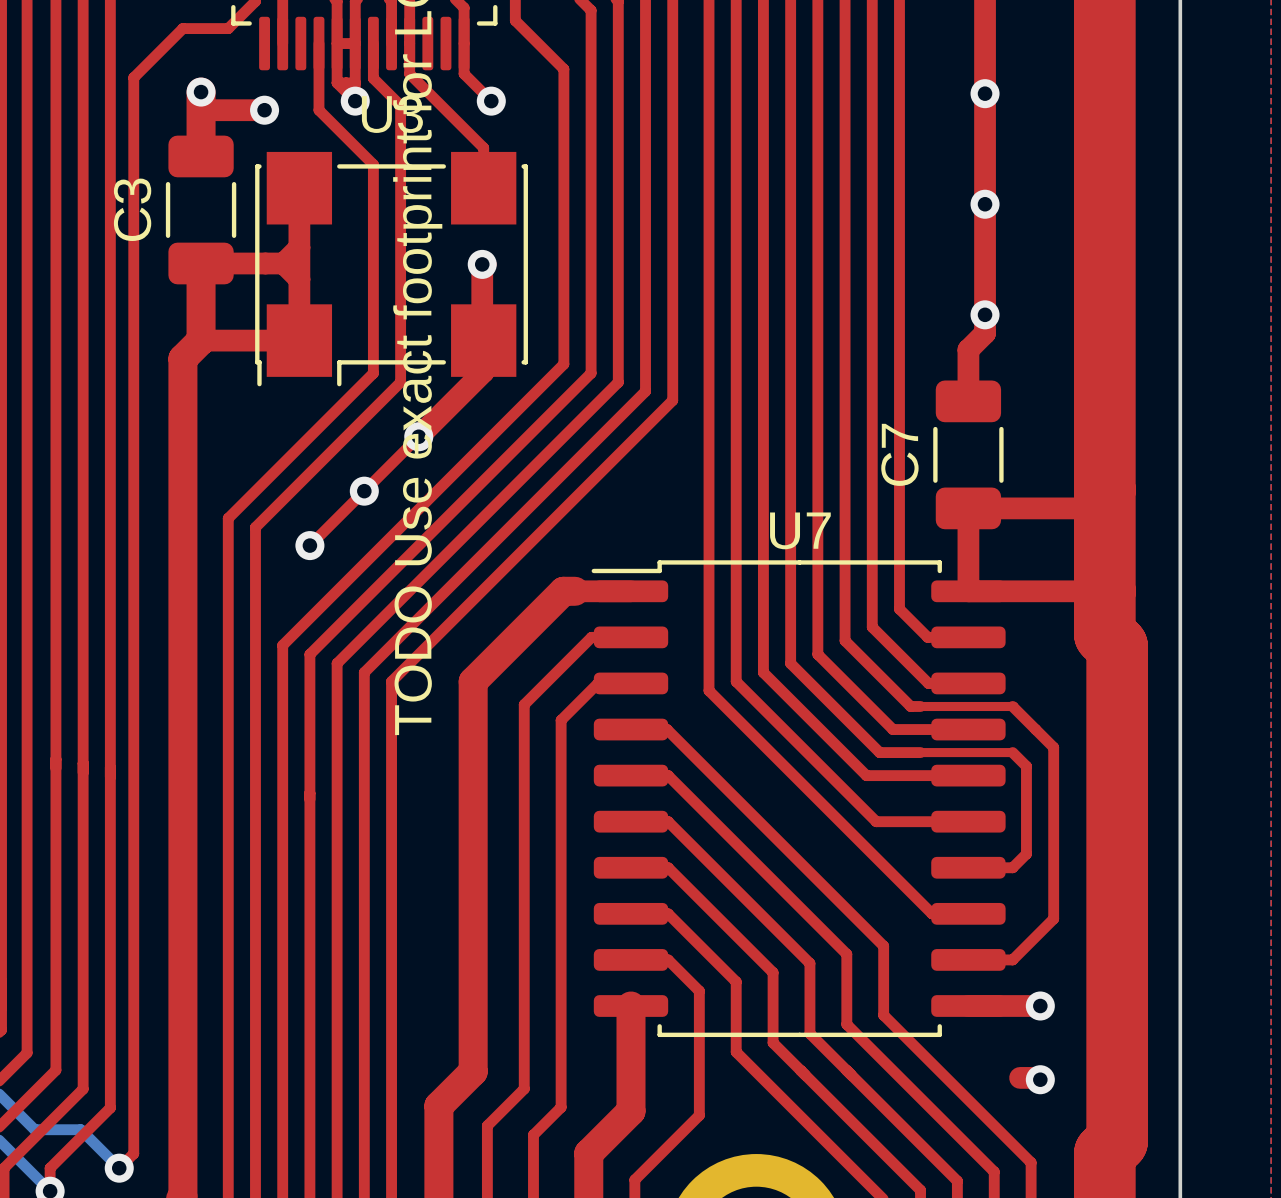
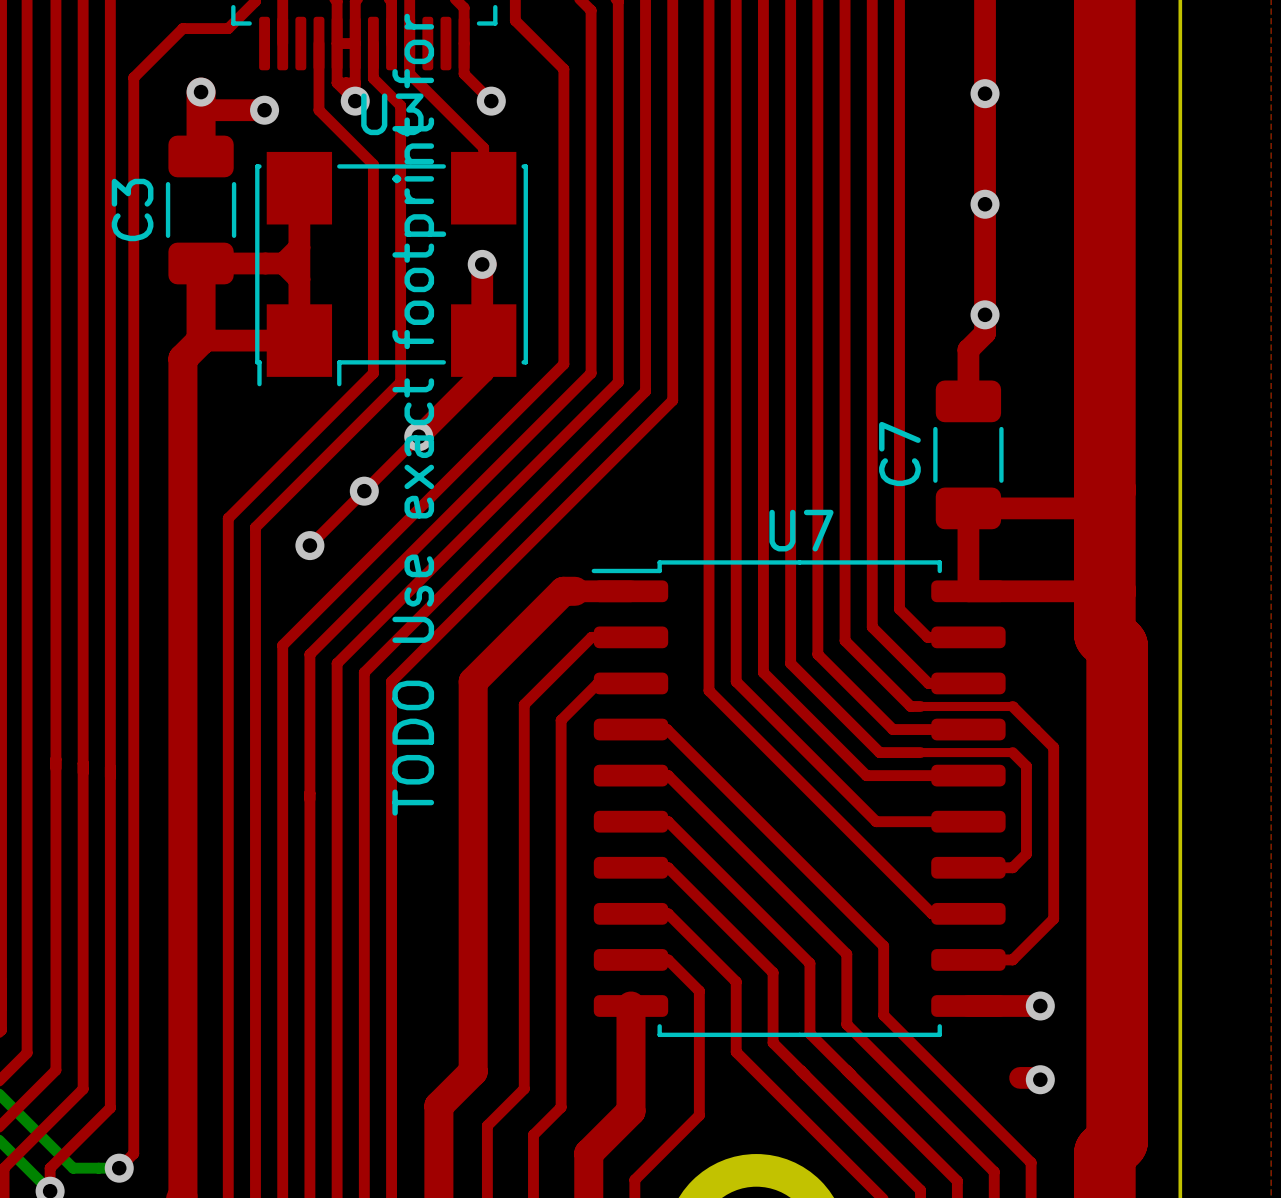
bottom track: (34, 1129) (80, 1129) (119, 1168) -> (34, 1129) (73, 1168) (119, 1168)

